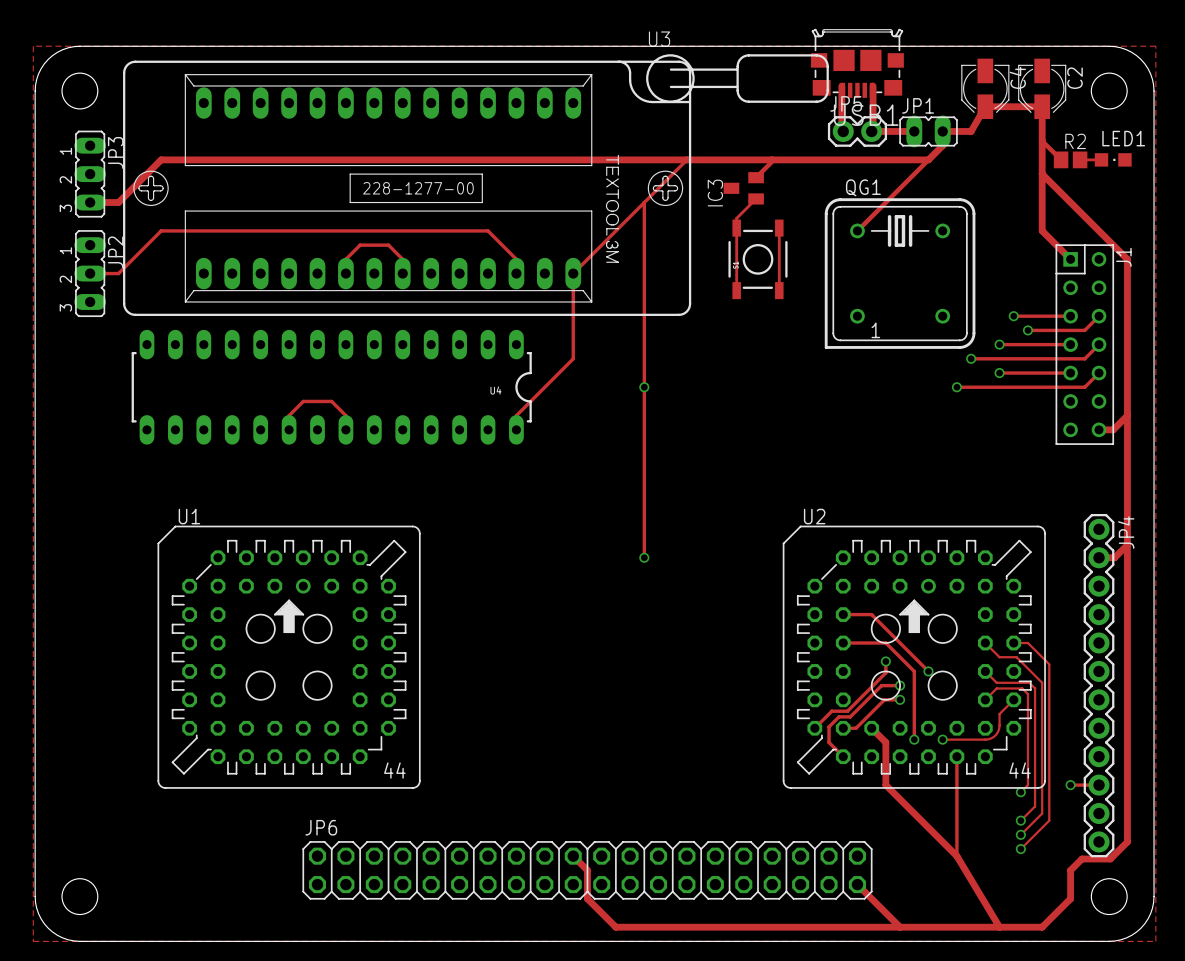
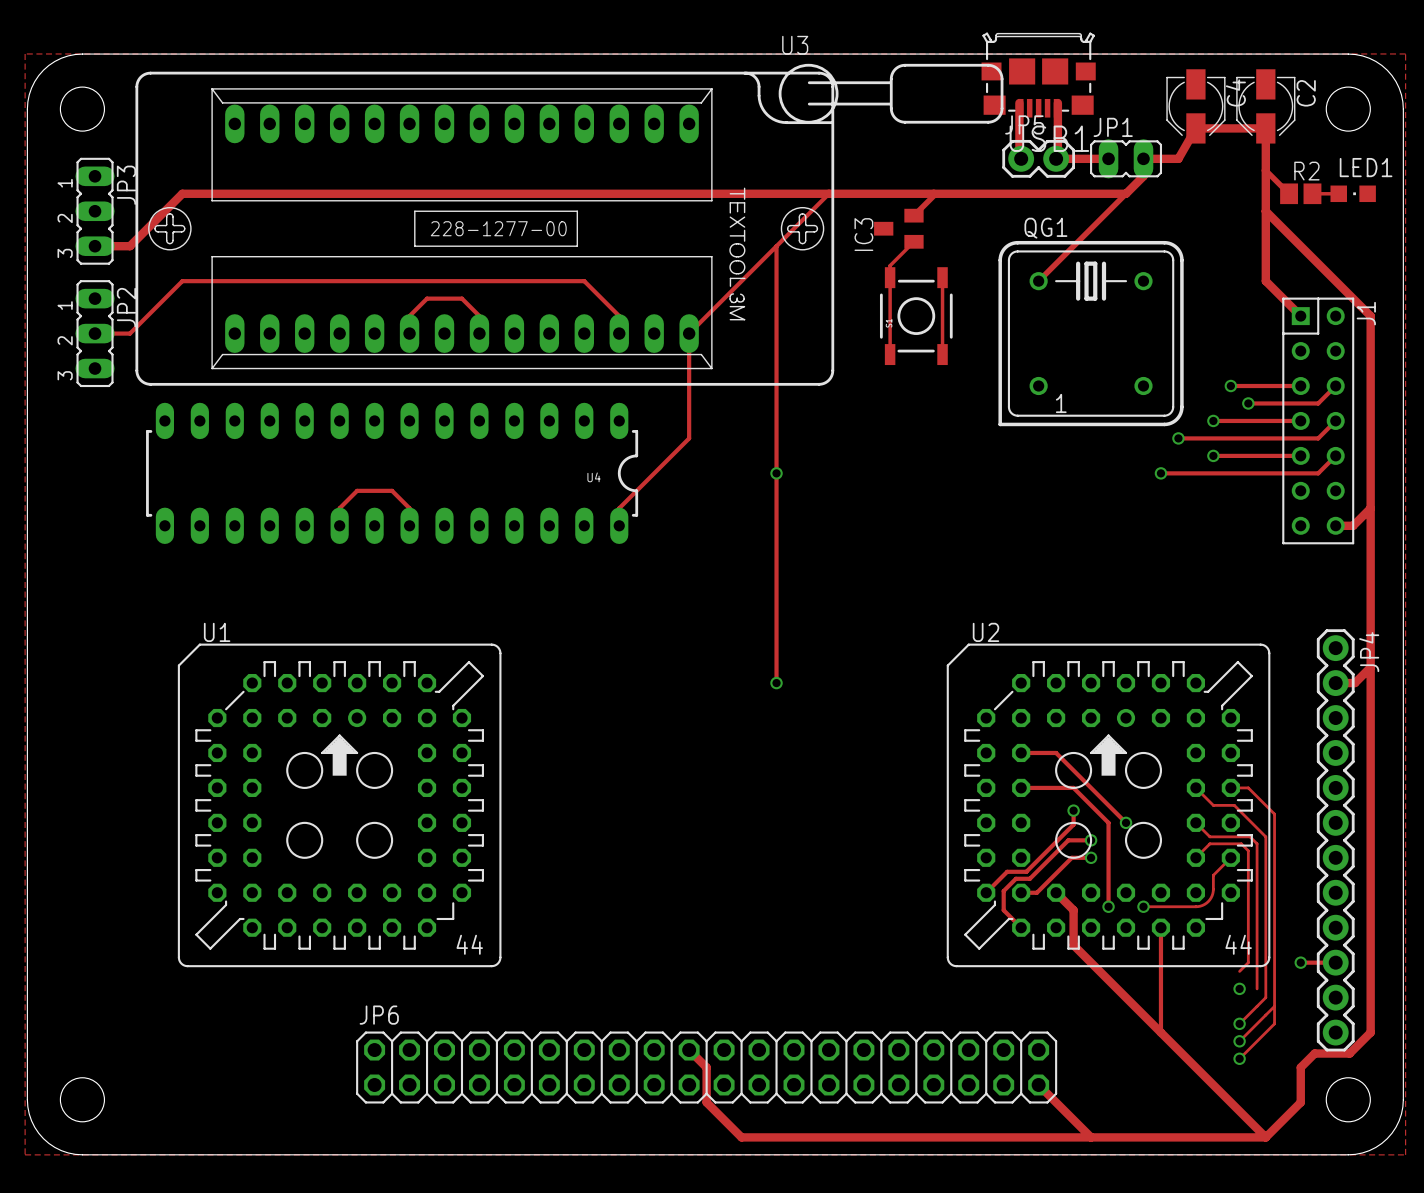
track: (885, 770) (885, 785) (956, 856) -> (1073, 945) (1265, 1137)
via: (1020, 792) -> none
via: none -> (1239, 988)
track: (1035, 806) (1020, 820) -> none
via: (1020, 820) -> none
track: none -> (1274, 1006) (1274, 1023) (1239, 1058)
track: (956, 841) (956, 856) -> none
track: (956, 856) (999, 927) -> none
via: none -> (1239, 1058)

